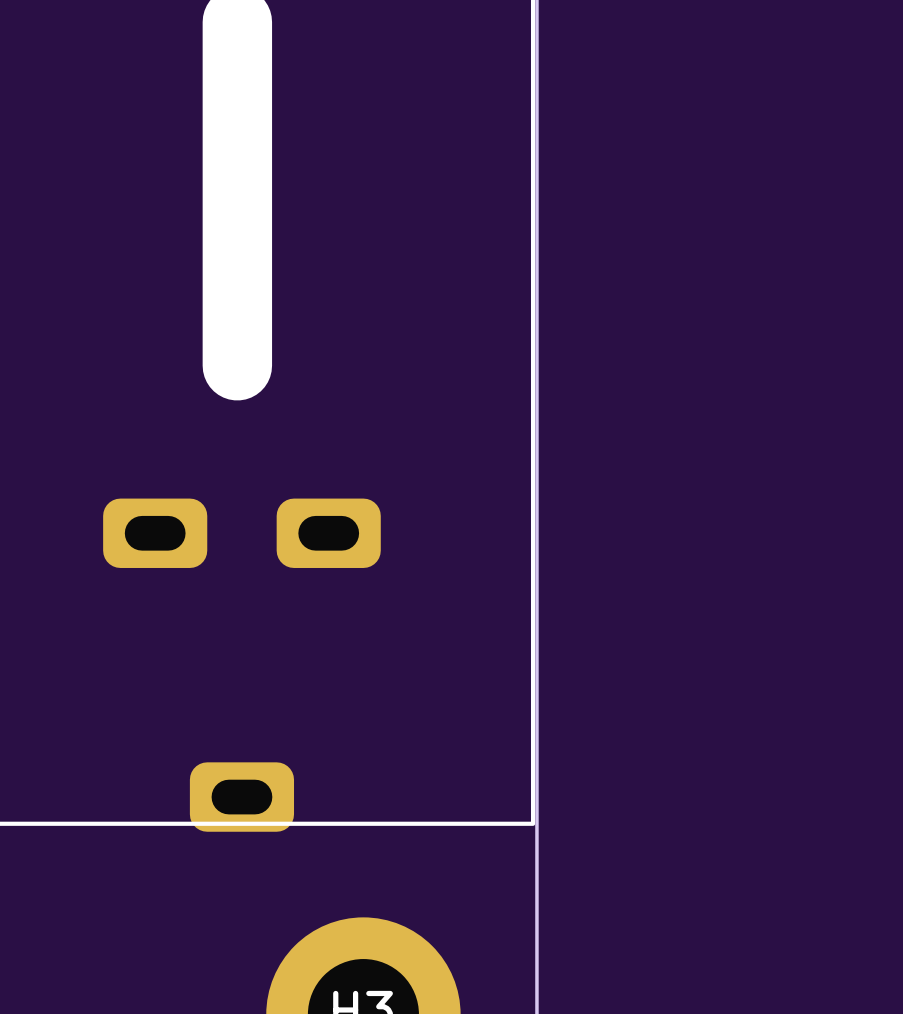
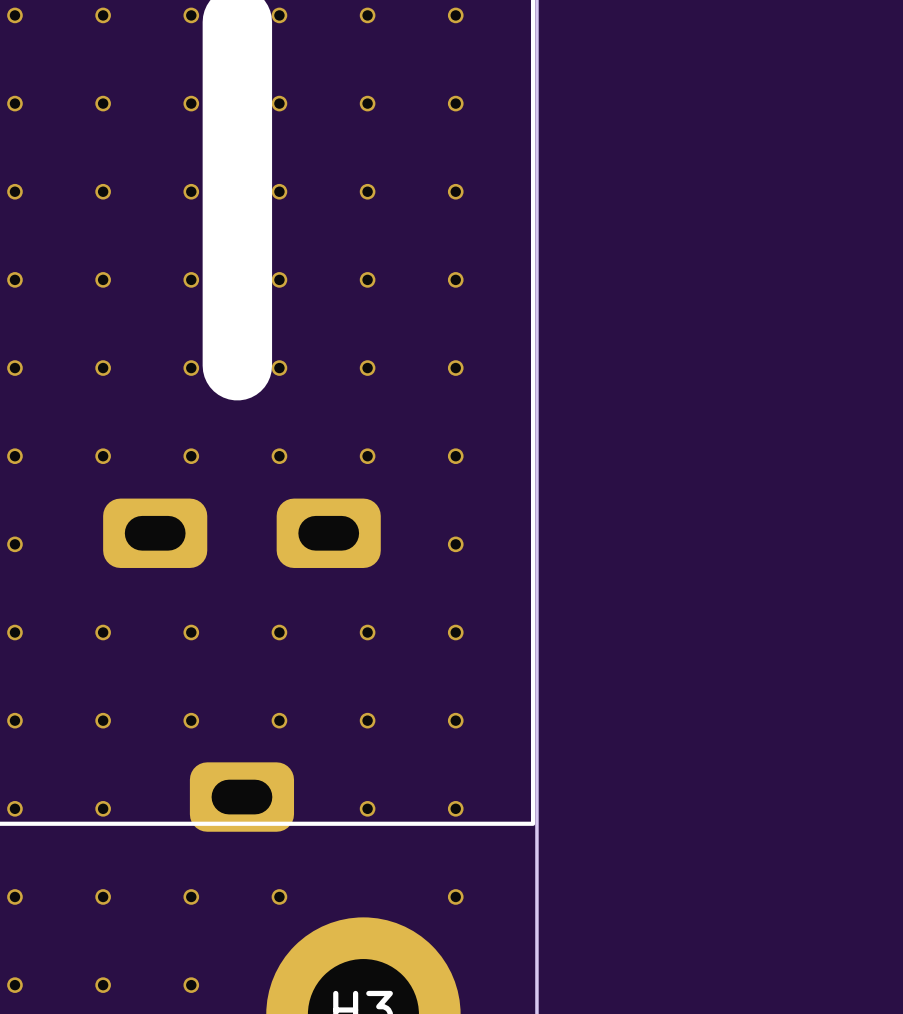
via: none -> (14, 15)
via: none -> (103, 15)
via: none -> (191, 15)
via: none -> (279, 15)
via: none -> (367, 15)
via: none -> (455, 15)
via: none -> (14, 103)
via: none -> (103, 103)
via: none -> (191, 103)
via: none -> (279, 103)
via: none -> (367, 103)
via: none -> (455, 103)
via: none -> (14, 191)
via: none -> (103, 191)
via: none -> (191, 191)
via: none -> (279, 191)
via: none -> (367, 191)
via: none -> (455, 191)
via: none -> (14, 279)
via: none -> (103, 279)
via: none -> (191, 279)
via: none -> (279, 279)
via: none -> (367, 279)
via: none -> (455, 279)
via: none -> (14, 368)
via: none -> (103, 368)
via: none -> (191, 368)
via: none -> (279, 368)
via: none -> (367, 368)
via: none -> (455, 368)
via: none -> (14, 456)
via: none -> (103, 456)
via: none -> (191, 456)
via: none -> (279, 456)
via: none -> (367, 456)
via: none -> (455, 456)
via: none -> (14, 544)
via: none -> (455, 544)
via: none -> (14, 632)
via: none -> (103, 632)
via: none -> (191, 632)
via: none -> (279, 632)
via: none -> (367, 632)
via: none -> (455, 632)
via: none -> (14, 720)
via: none -> (103, 720)
via: none -> (191, 720)
via: none -> (279, 720)
via: none -> (367, 720)
via: none -> (455, 720)
via: none -> (14, 808)
via: none -> (103, 808)
via: none -> (367, 808)
via: none -> (455, 808)
via: none -> (14, 896)
via: none -> (103, 896)
via: none -> (191, 896)
via: none -> (279, 896)
via: none -> (455, 896)
via: none -> (14, 985)
via: none -> (103, 985)
via: none -> (191, 985)

